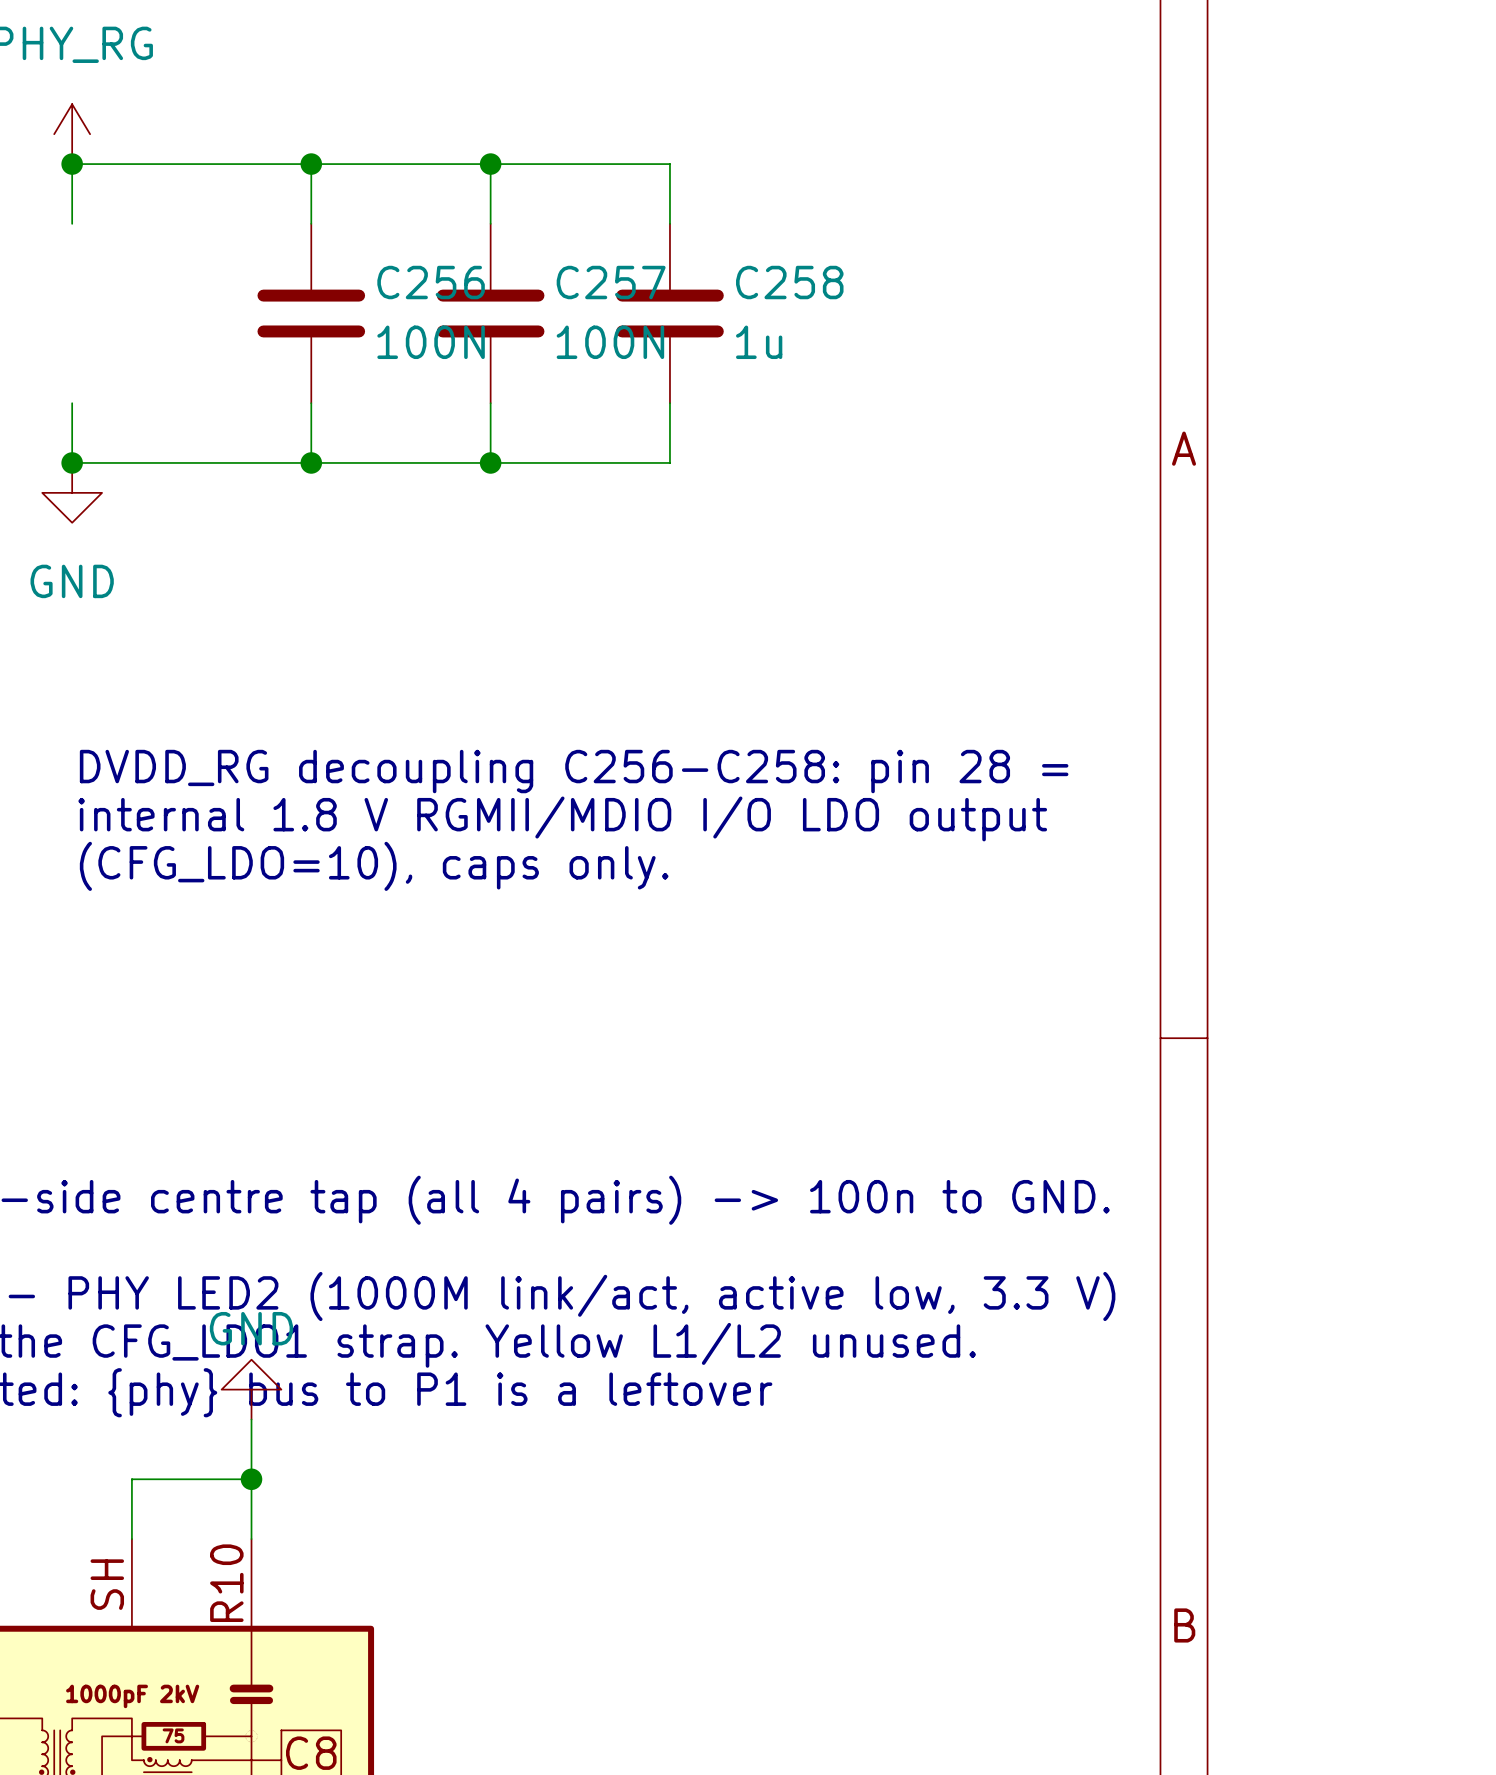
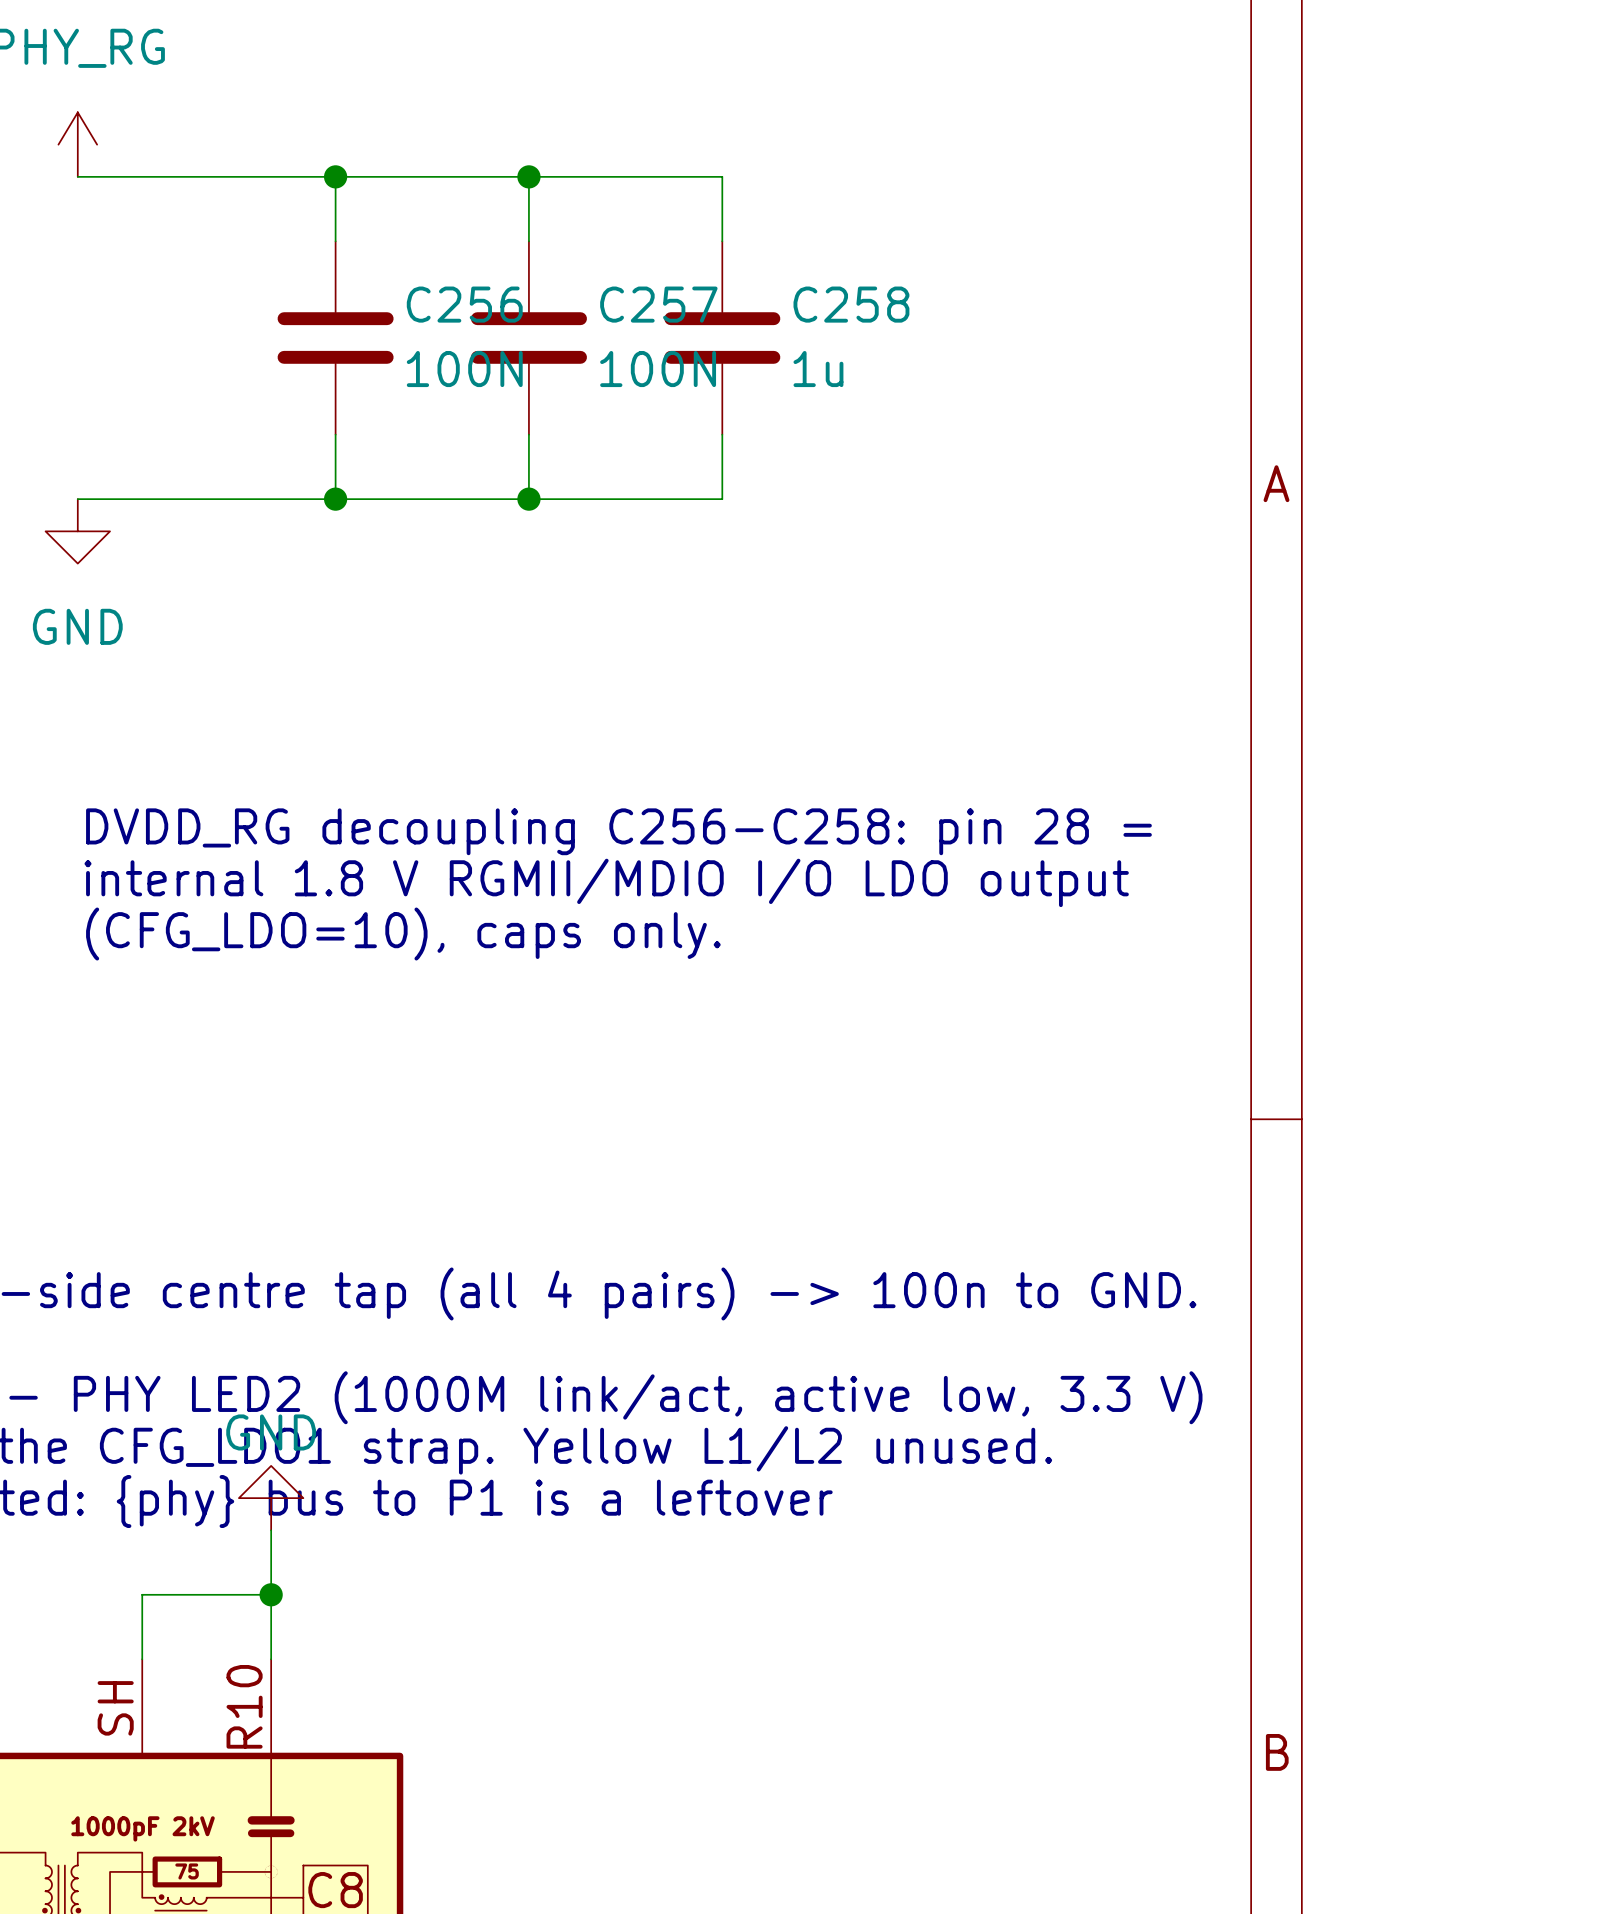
wire: (72, 164) (72, 223) -> none
junction: (72, 164) -> none
wire: (72, 403) (72, 462) -> none
junction: (72, 462) -> none

